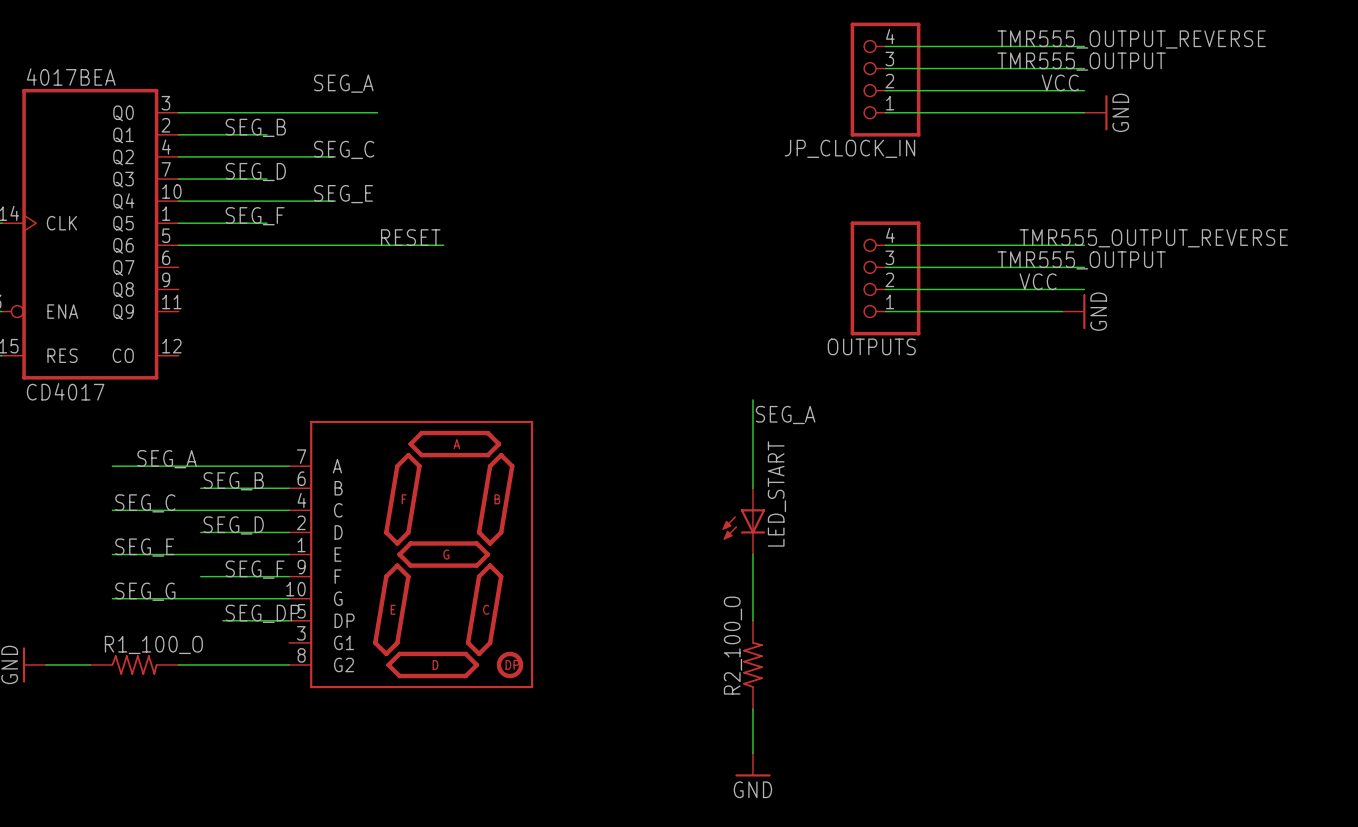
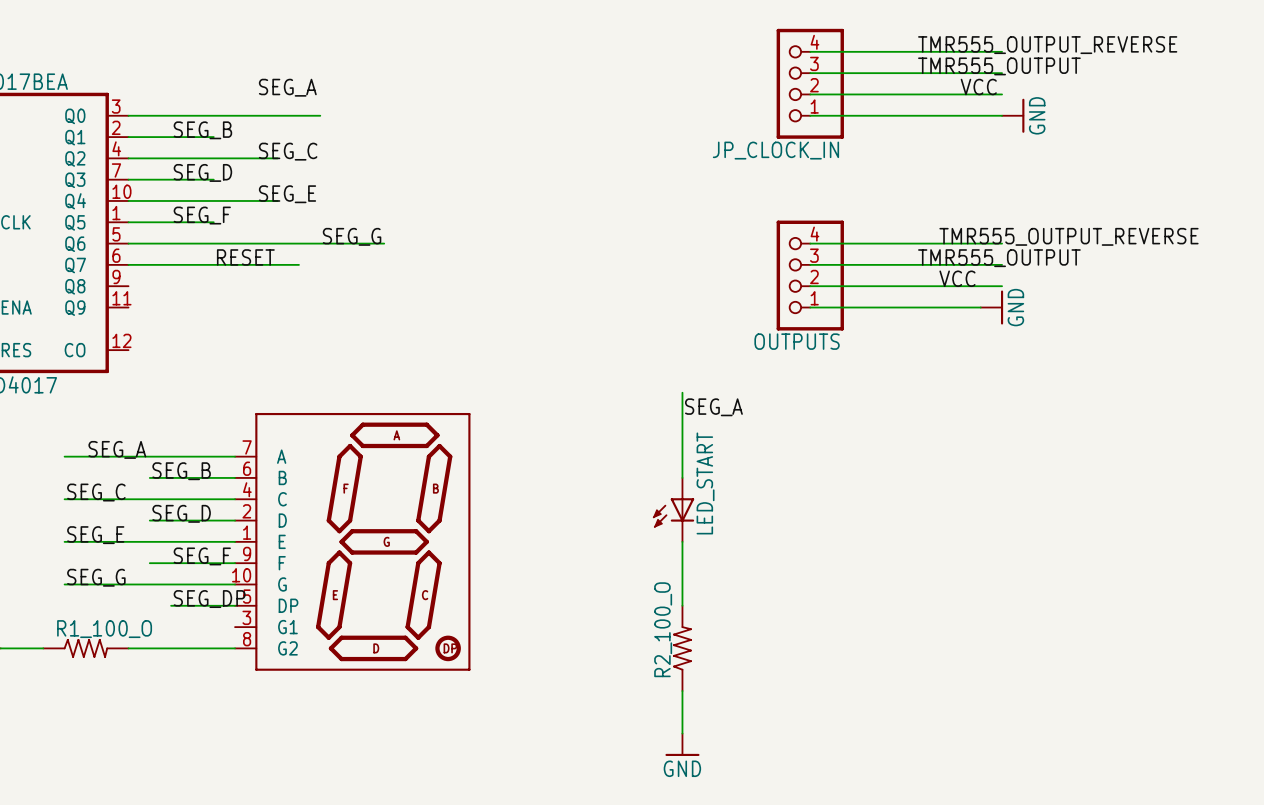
label: RESET (410, 237) -> SEG_G (352, 236)
label: none -> RESET (245, 257)
wire: none -> (128, 264) (298, 264)

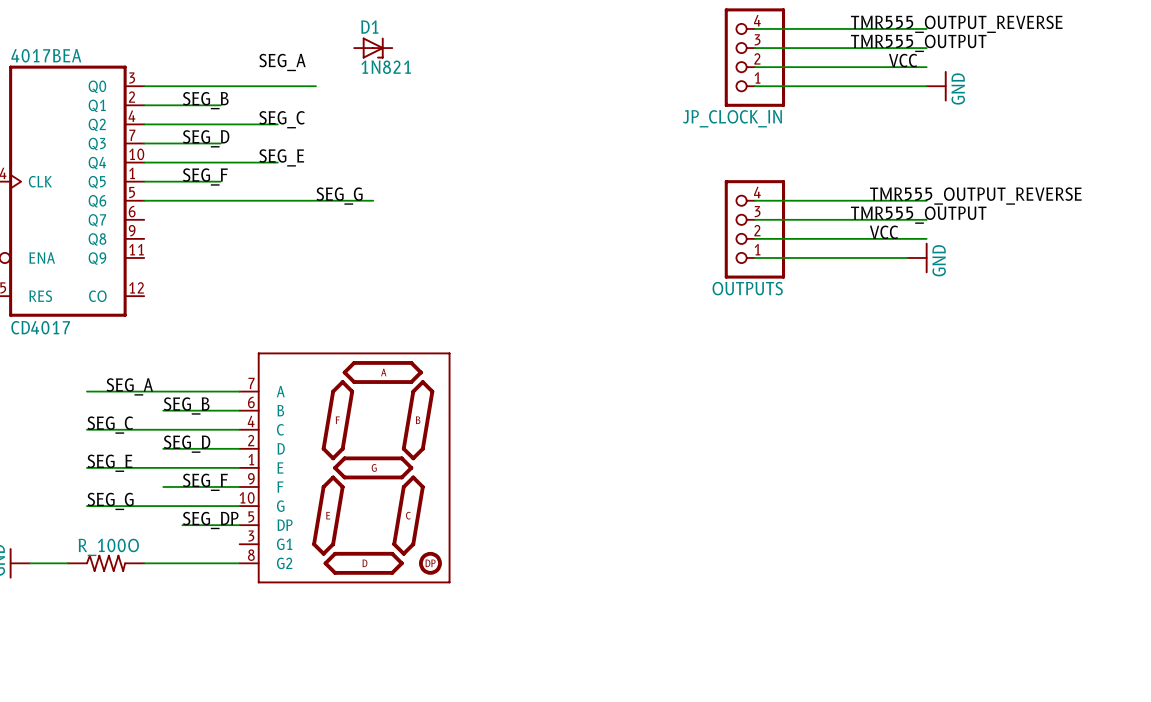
D1: none -> 1N821 (373, 48)
label: RESET (245, 257) -> none
wire: (128, 264) (298, 264) -> none
wire: (682, 392) (682, 477) -> none
label: SEG_A (713, 407) -> none
LED_START: (673, 509) -> none
wire: (682, 541) (682, 605) -> none
R1_100_O name: R1_100_O (104, 629) -> R_100O (108, 547)
R2_100_O: (682, 648) -> none
wire: (682, 691) (682, 733) -> none
power symbol: GND (682, 744) -> none

